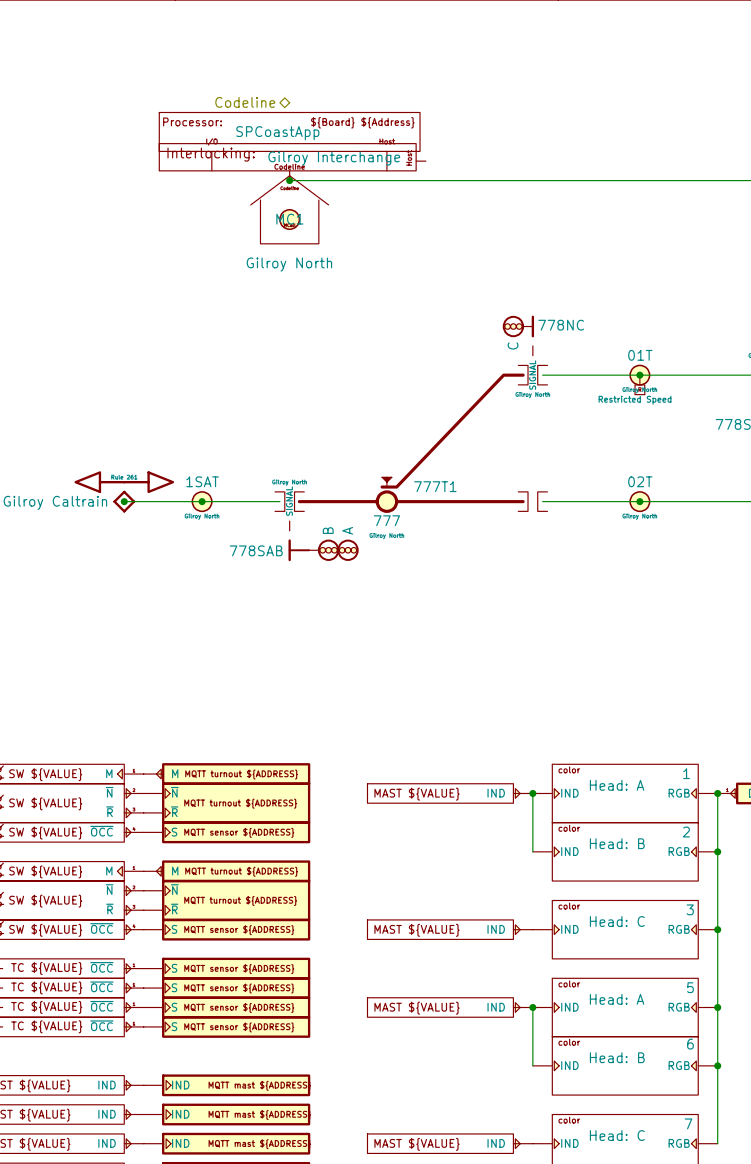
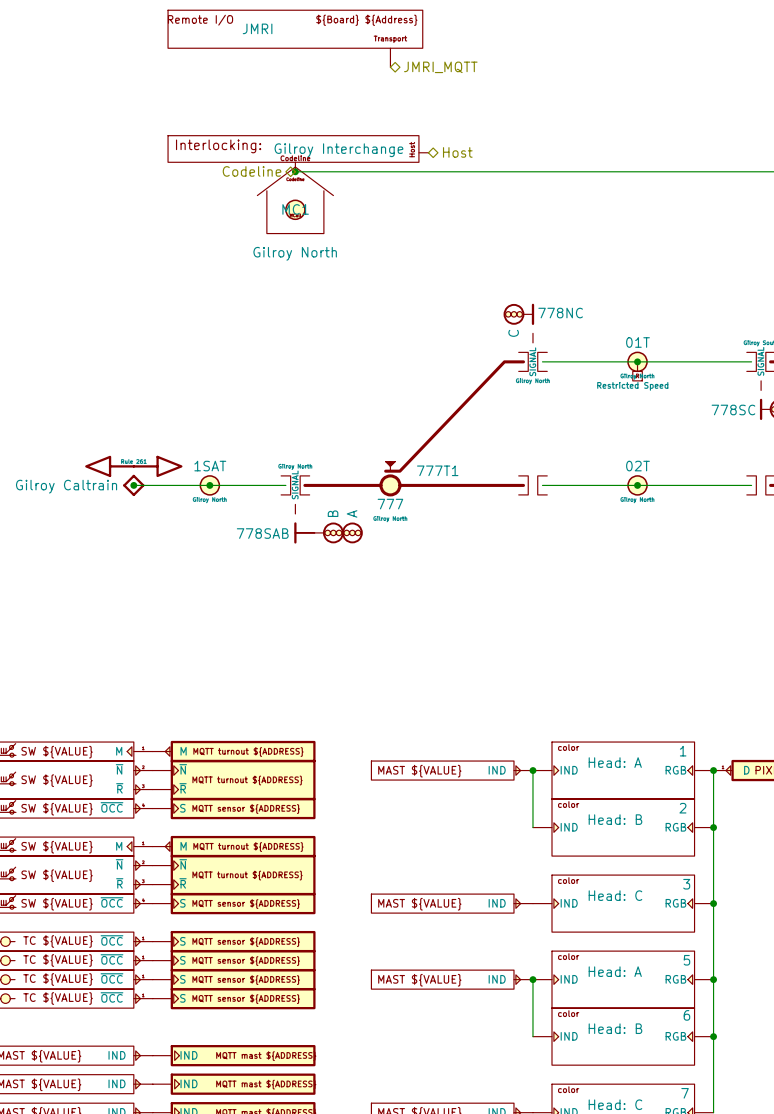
part: none -> JMRI (295, 38)
hierarchical label: none -> JMRI_MQTT (440, 67)
hierarchical label position: Codeline (245, 102) -> Codeline (252, 171)
part: SPCoastApp (289, 141) -> none
hierarchical label: none -> Host (457, 152)

